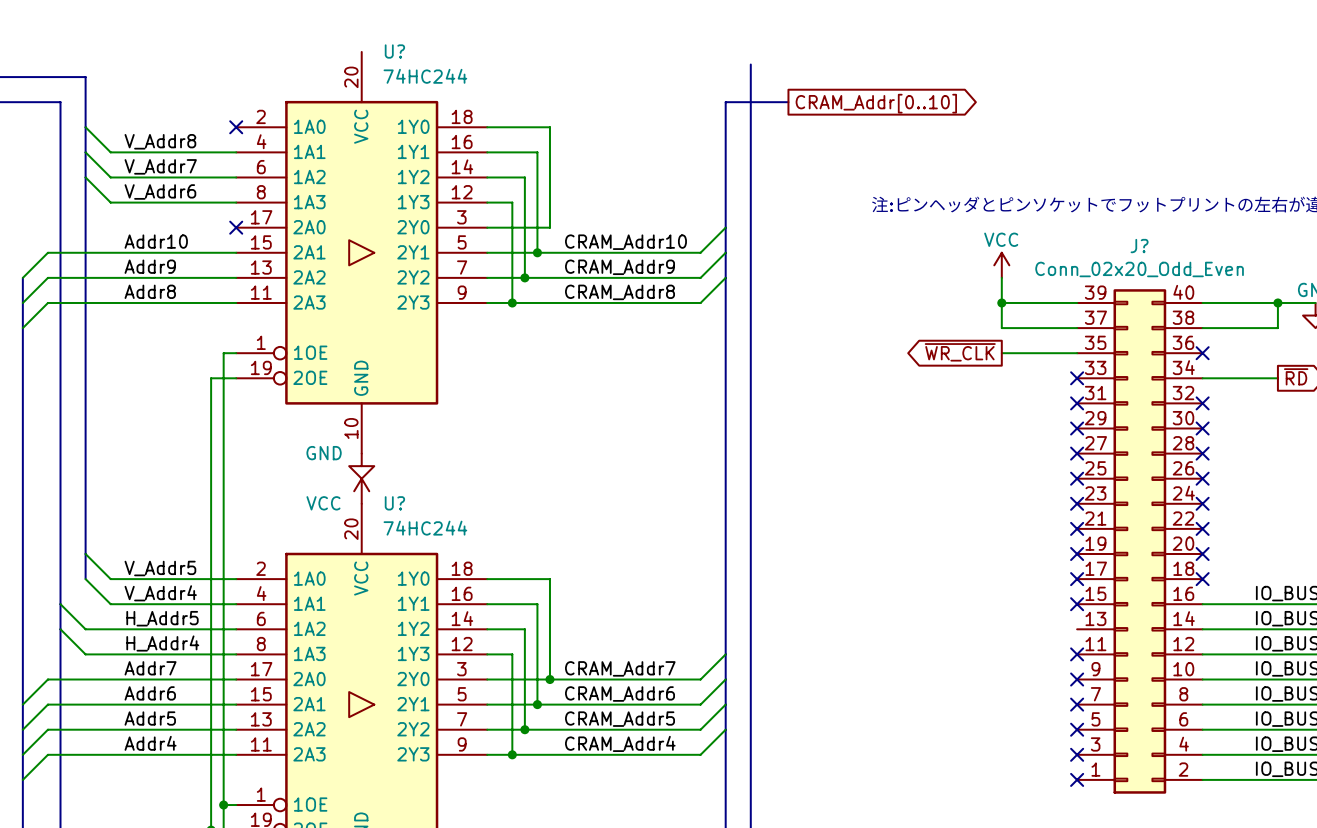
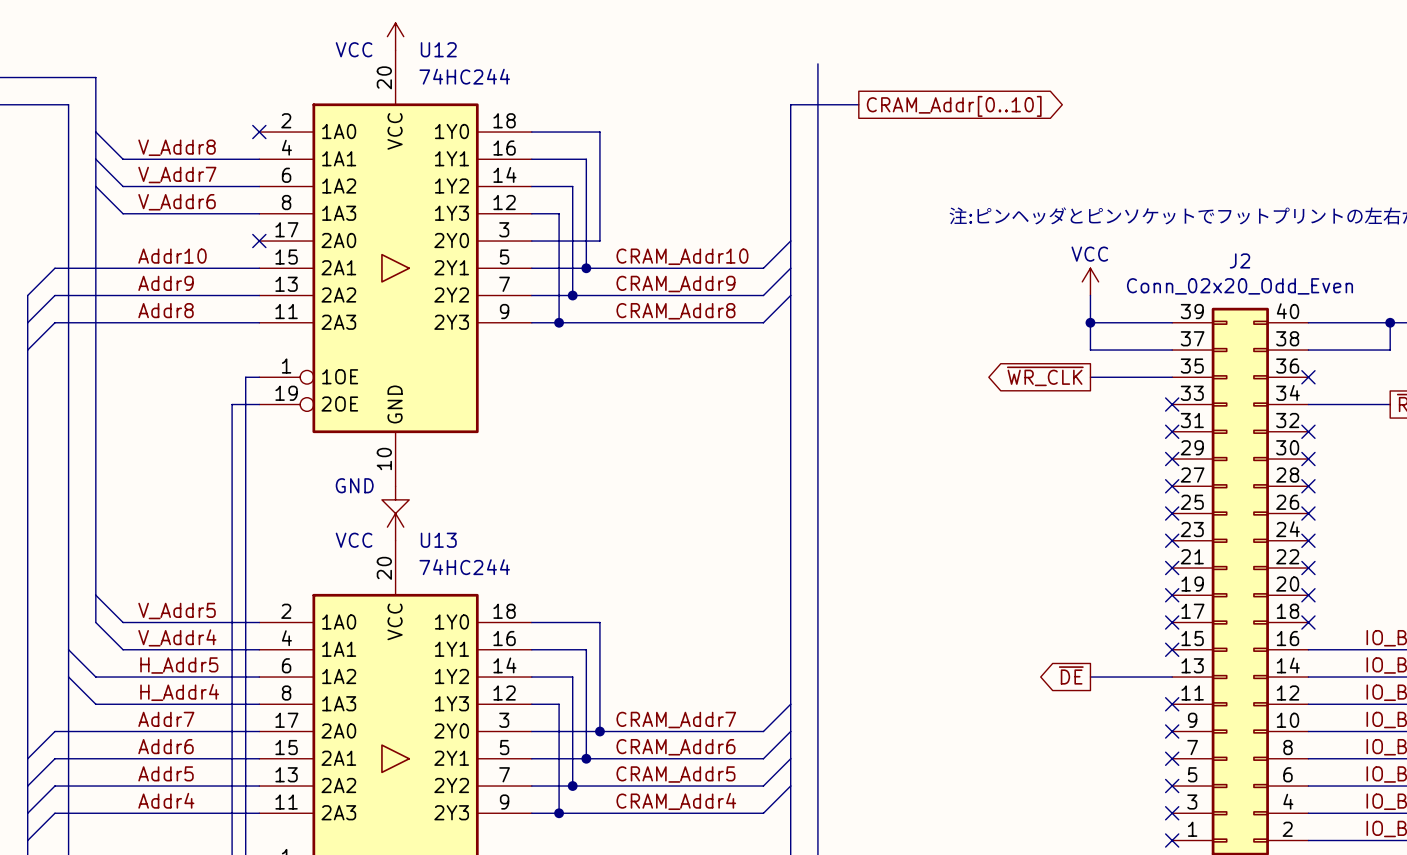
power symbol: none -> VCC (395, 36)
U? name: U? (394, 51) -> U12 (438, 49)
J? name: J? (1139, 246) -> J2 (1240, 260)
U? name: U? (394, 503) -> U13 (438, 540)
global label: none -> ~{DE} (1071, 675)
wire: none -> (1090, 677) (1172, 677)

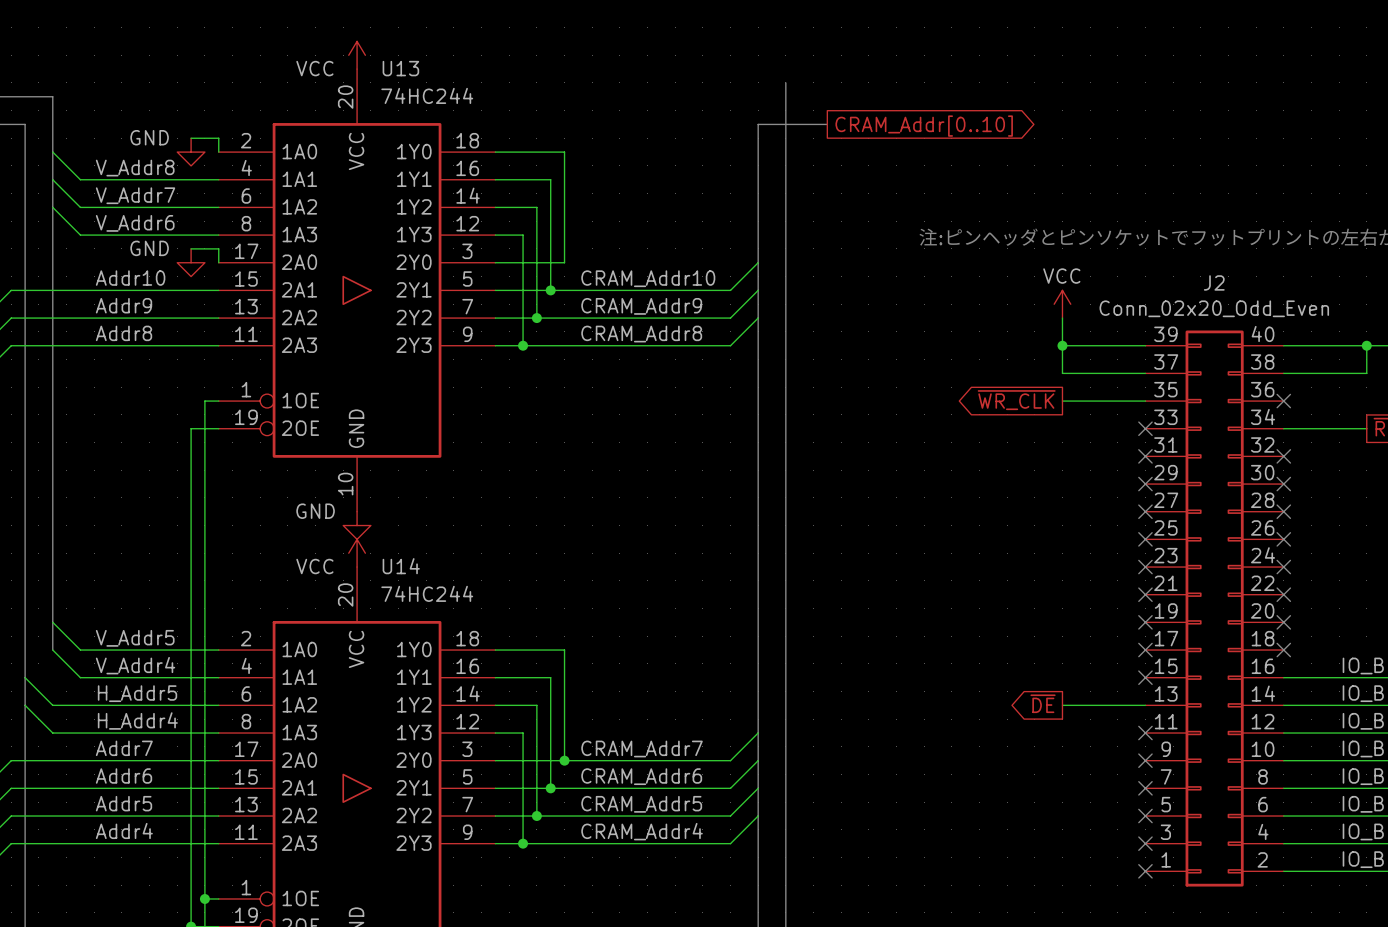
U12 name: U12 (438, 49) -> U13 (400, 68)
wire: none -> (191, 138) (218, 138) (218, 152)
power symbol: none -> GND (191, 152)
no-connect mark: (259, 132) -> none
wire: none -> (191, 248) (218, 248) (218, 262)
power symbol: none -> GND (191, 262)
no-connect mark: (259, 241) -> none
U13 name: U13 (438, 540) -> U14 (401, 566)

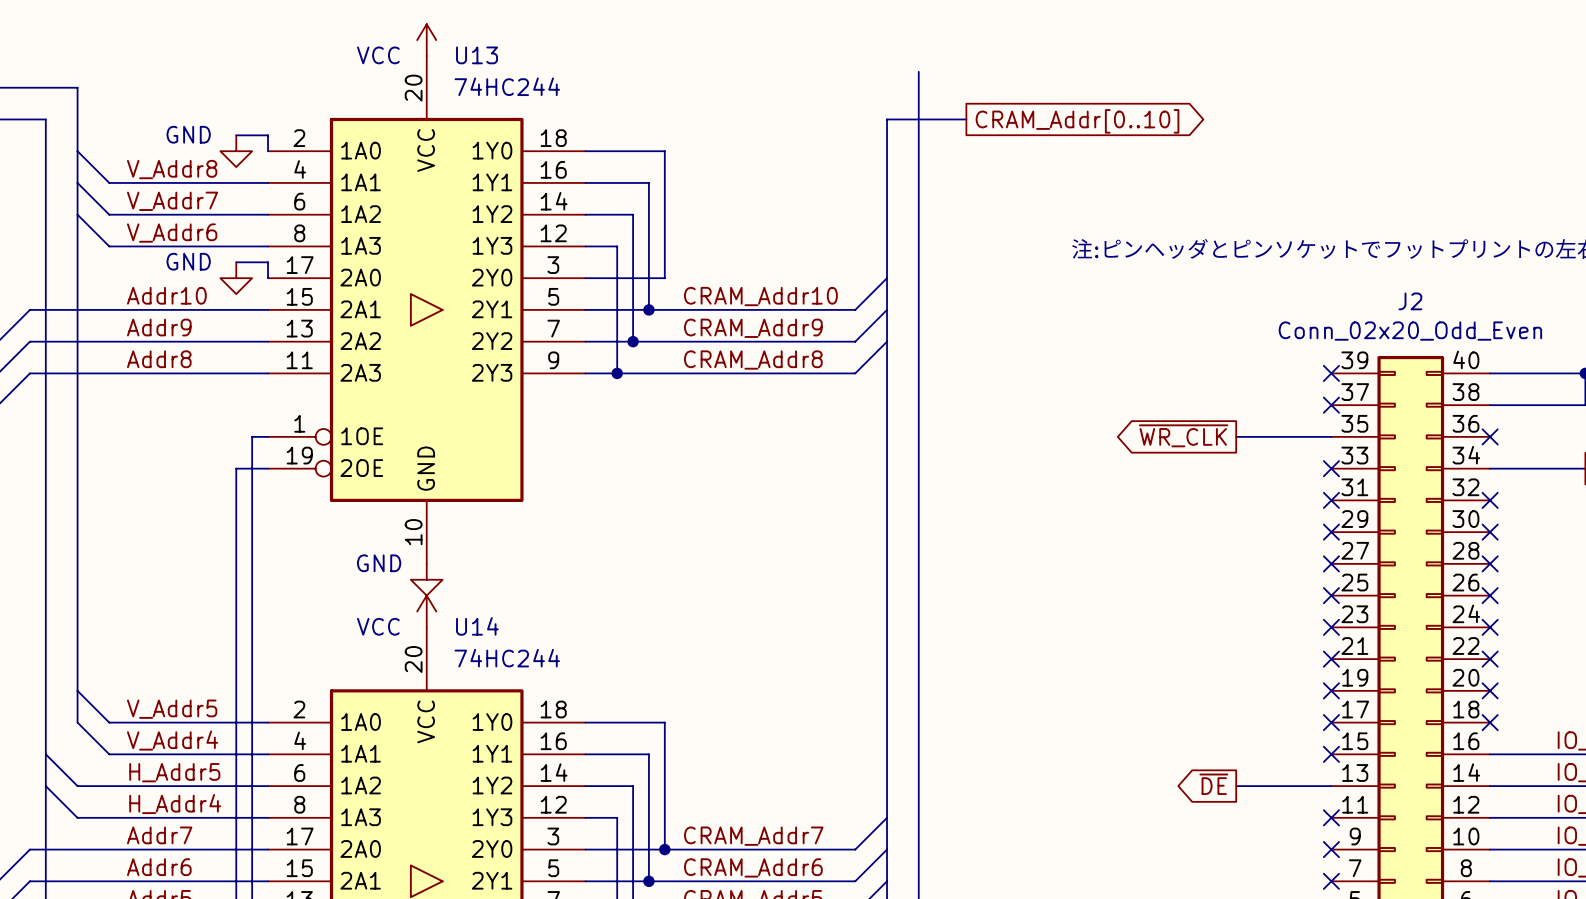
power symbol: VCC (1062, 304) -> none
wire: (1062, 318) (1062, 373) (1145, 373) -> none
wire: (1062, 345) (1145, 345) -> none
junction: (1062, 345) -> none
no-connect mark: none -> (1331, 373)
no-connect mark: none -> (1331, 405)

